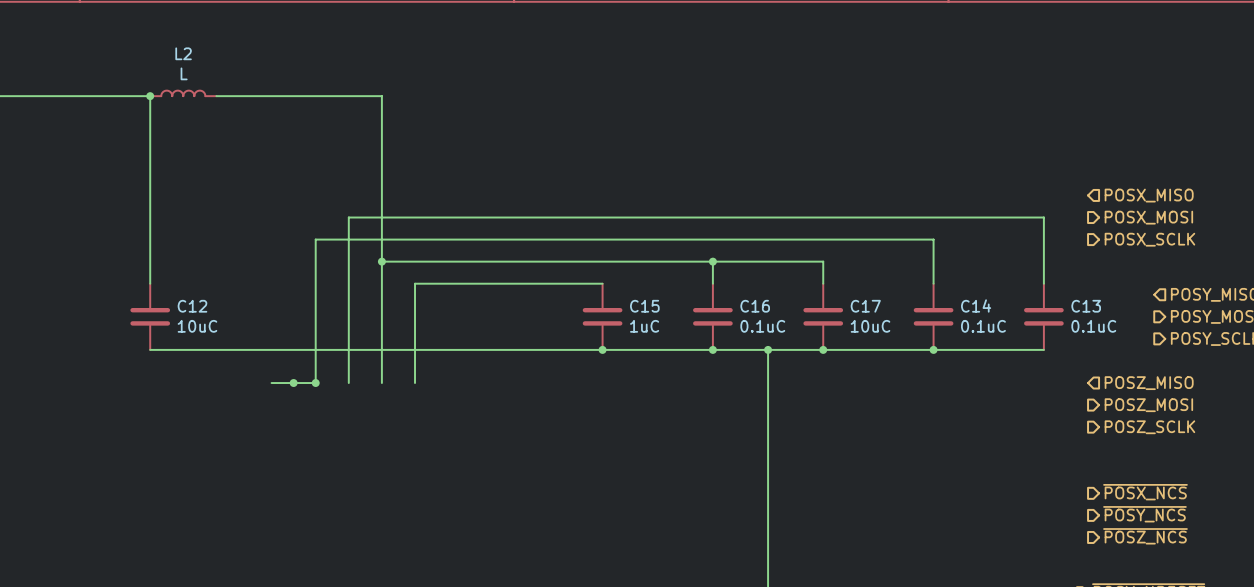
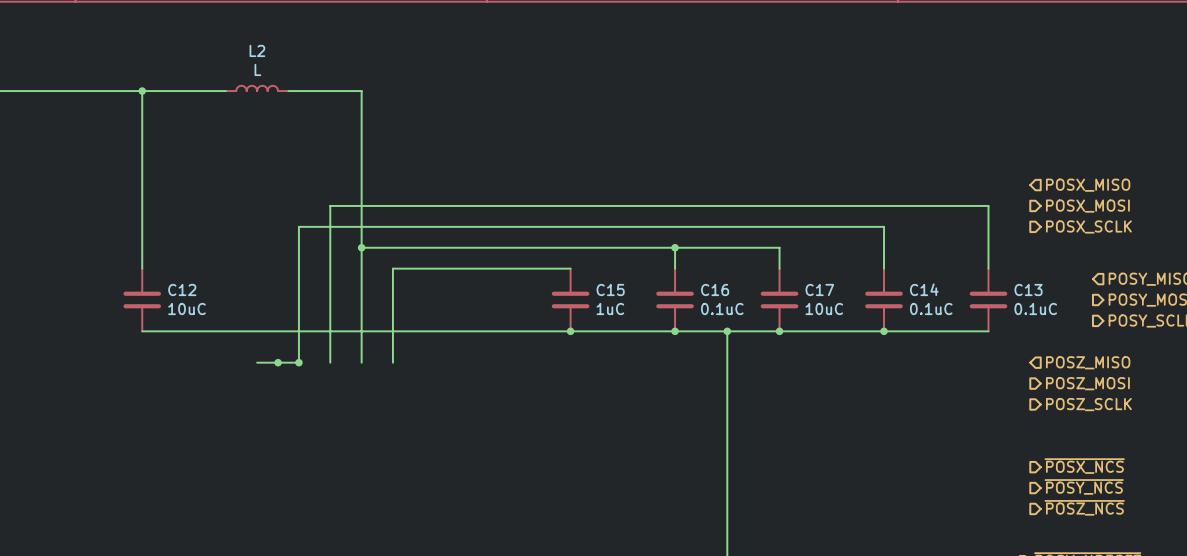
L2 position: (183, 93) -> (257, 88)
wire: (238, 96) (304, 96) -> (142, 91) (204, 91)

